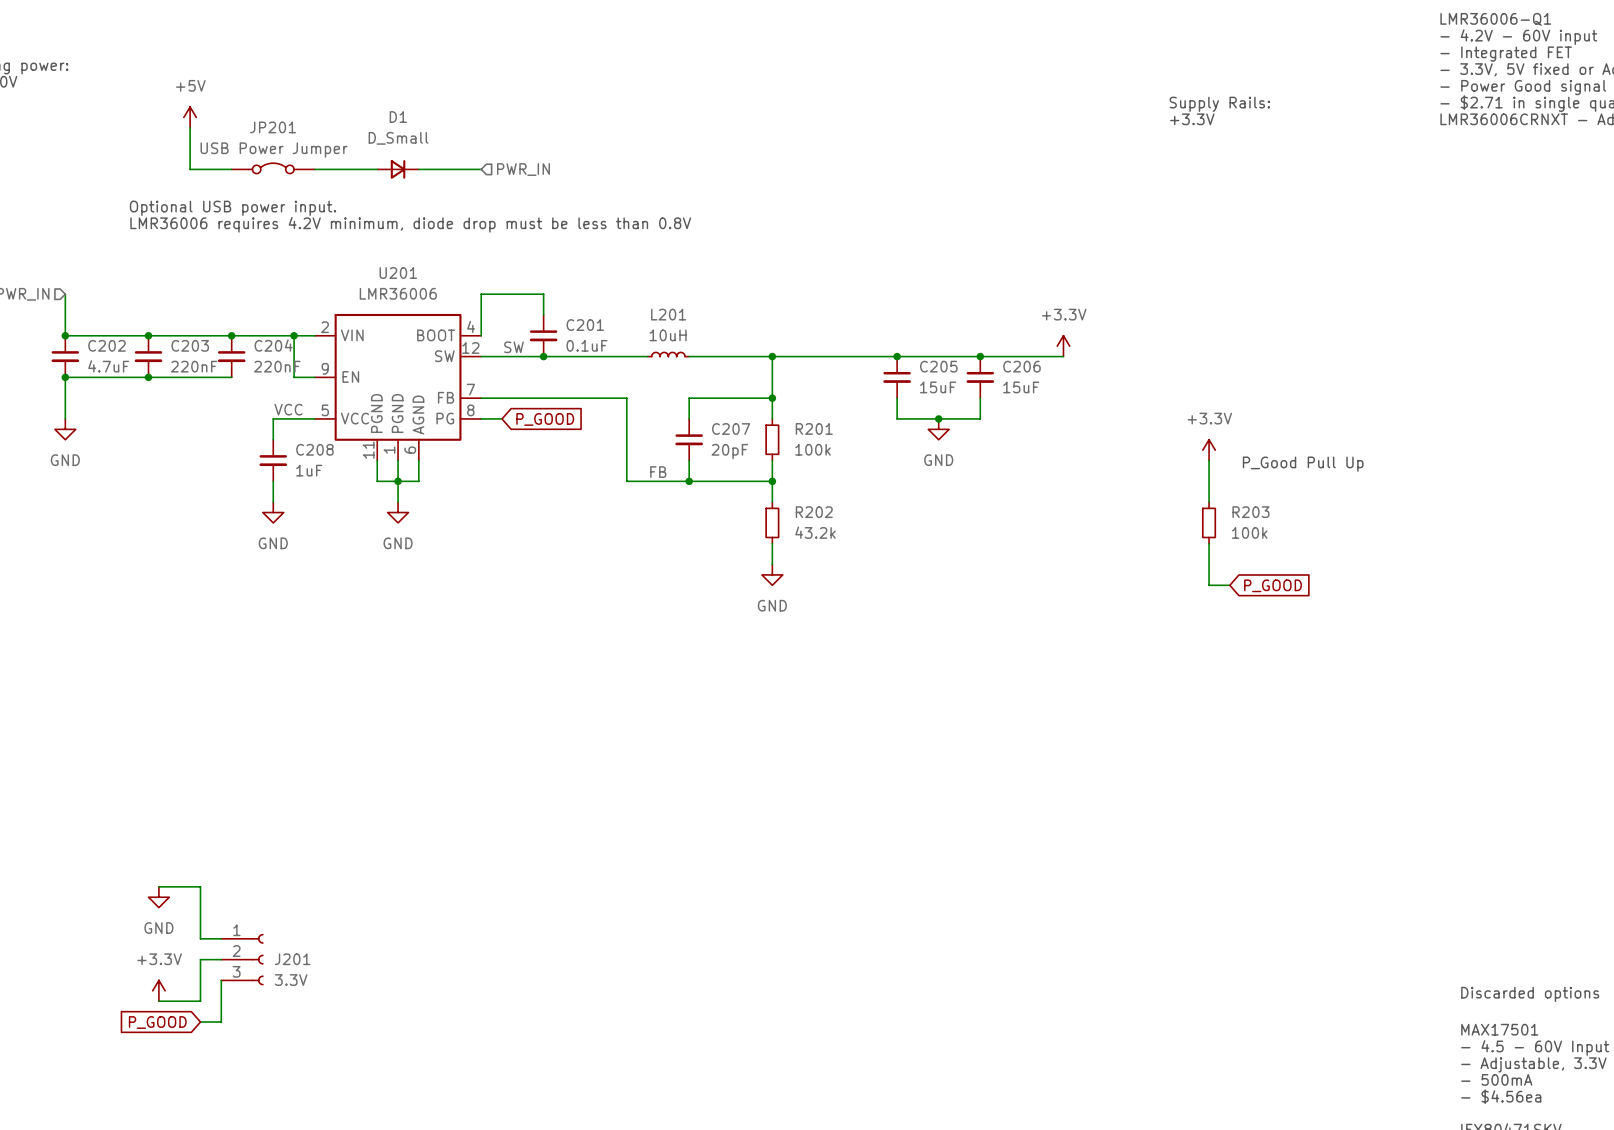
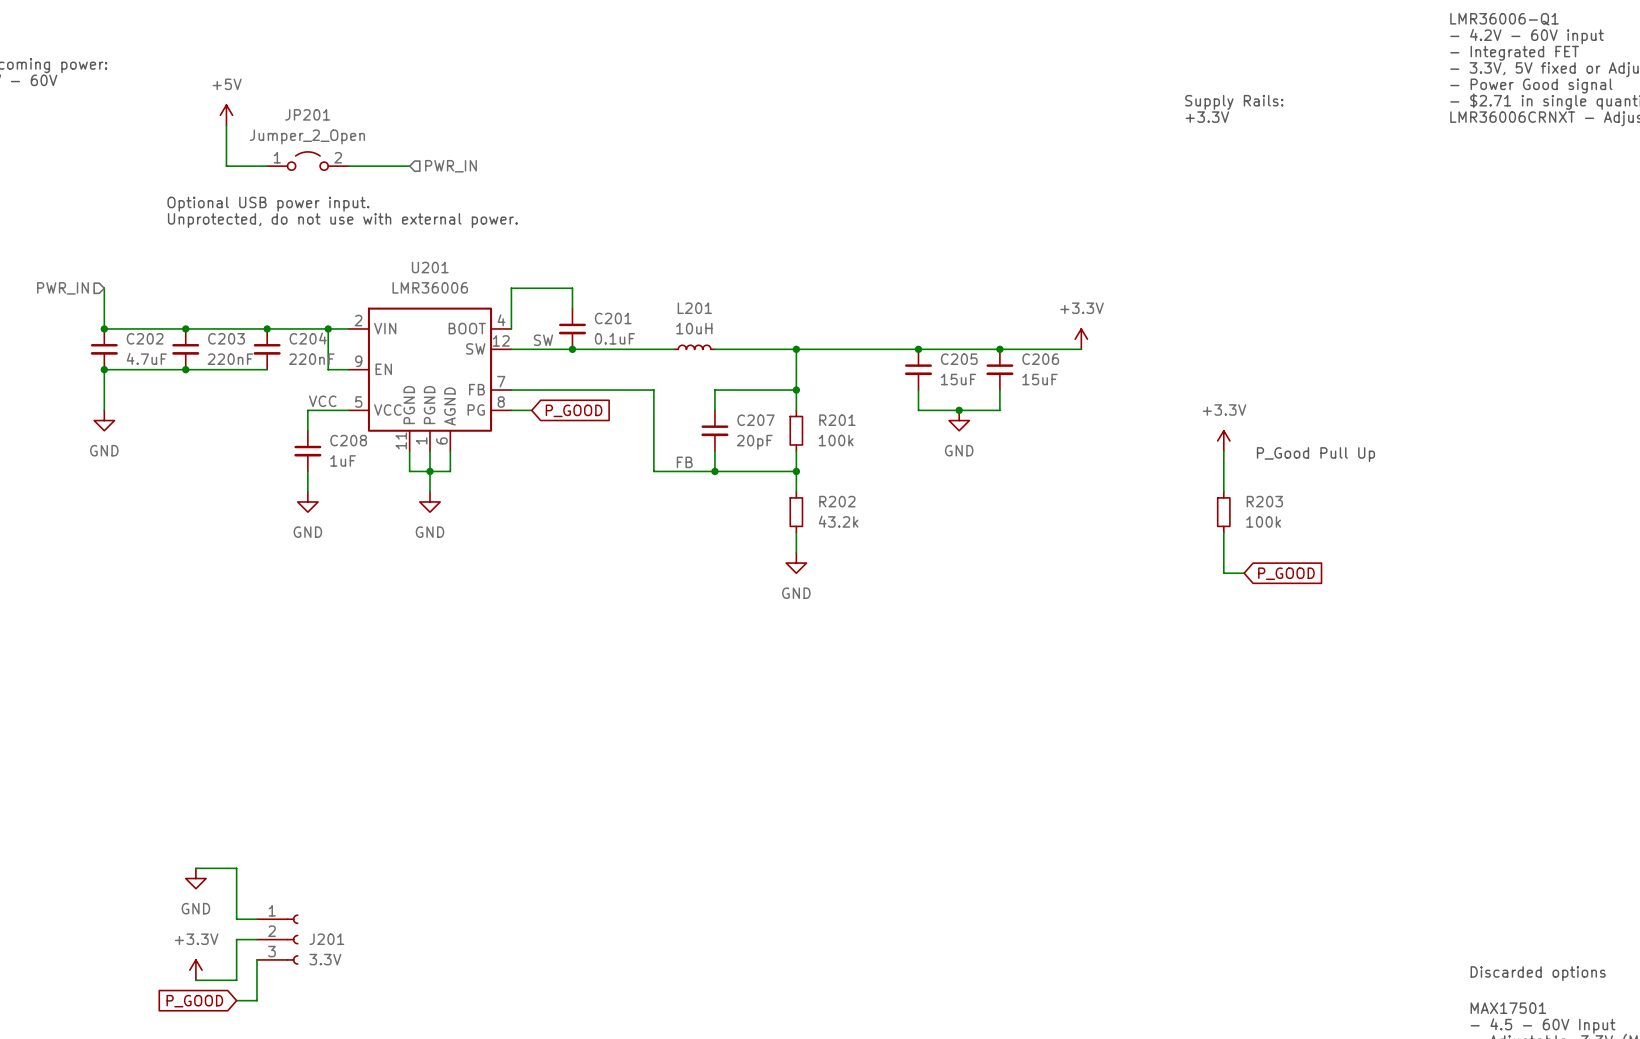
JP201 value: USB Power Jumper (274, 149) -> Jumper_2_Open (307, 136)
JP201 symbol: [231, 163, 315, 174] -> [267, 151, 349, 171]
D1: D_Small (398, 169) -> none
wire: (418, 169) (481, 169) -> none
hierarchical label position: PWR_IN (523, 169) -> PWR_IN (450, 166)
text: LMR36006 requires 4.2V minimum, diode drop must be less than 0.8V (410, 224) -> Unprotected, do not use with external power. (342, 220)

